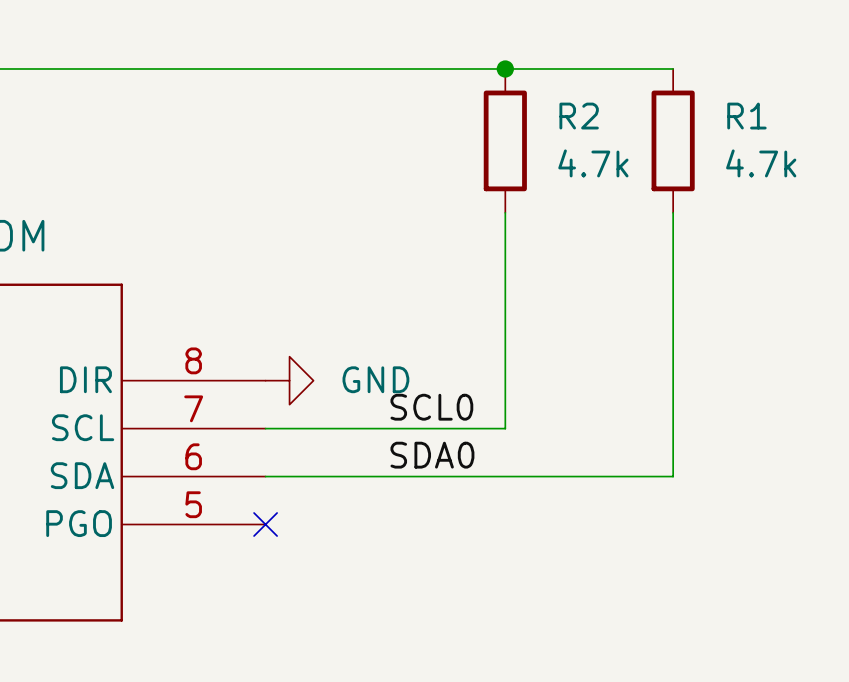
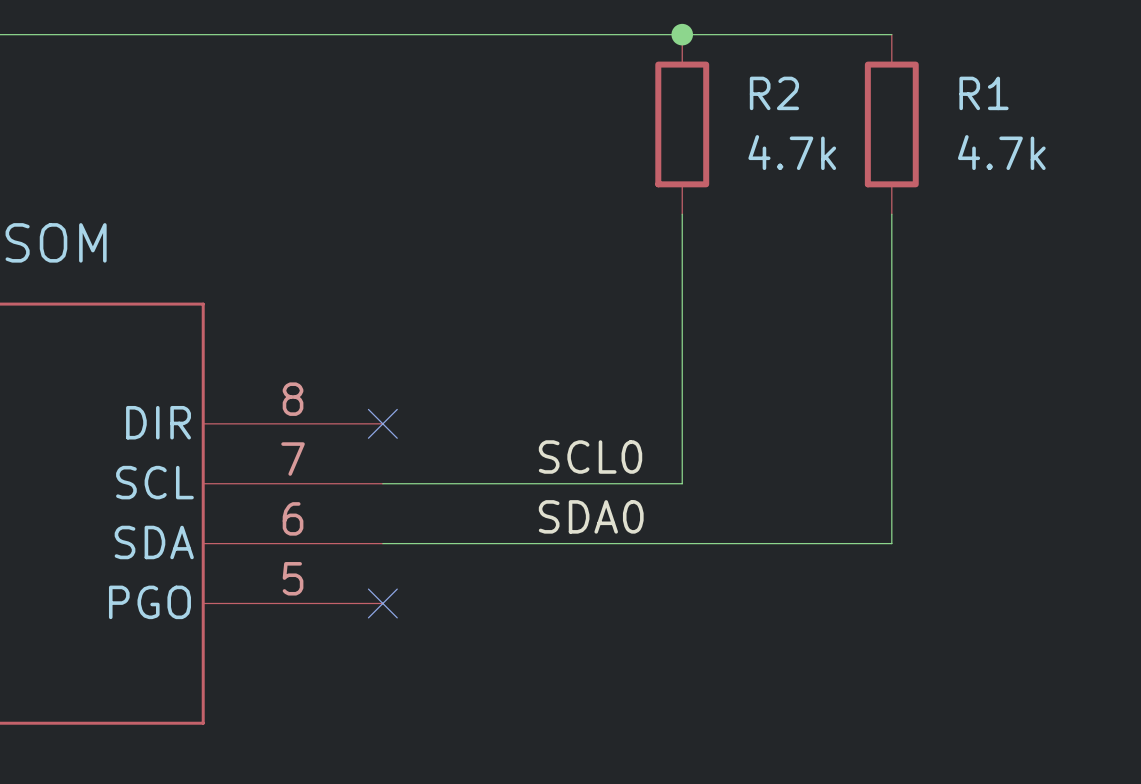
no-connect mark: none -> (382, 423)
power symbol: GND (289, 380) -> none

